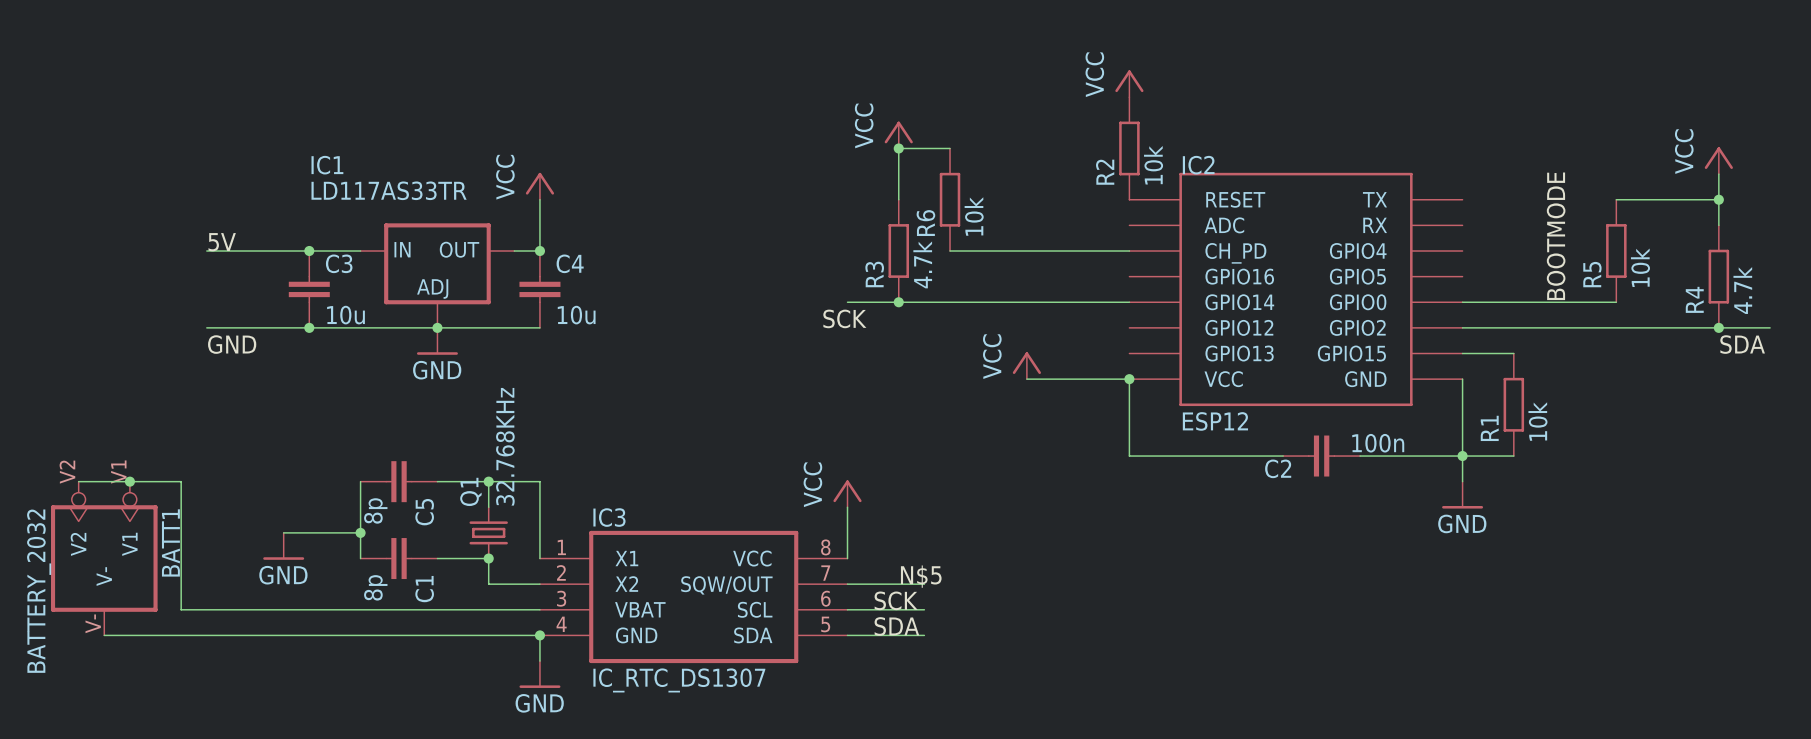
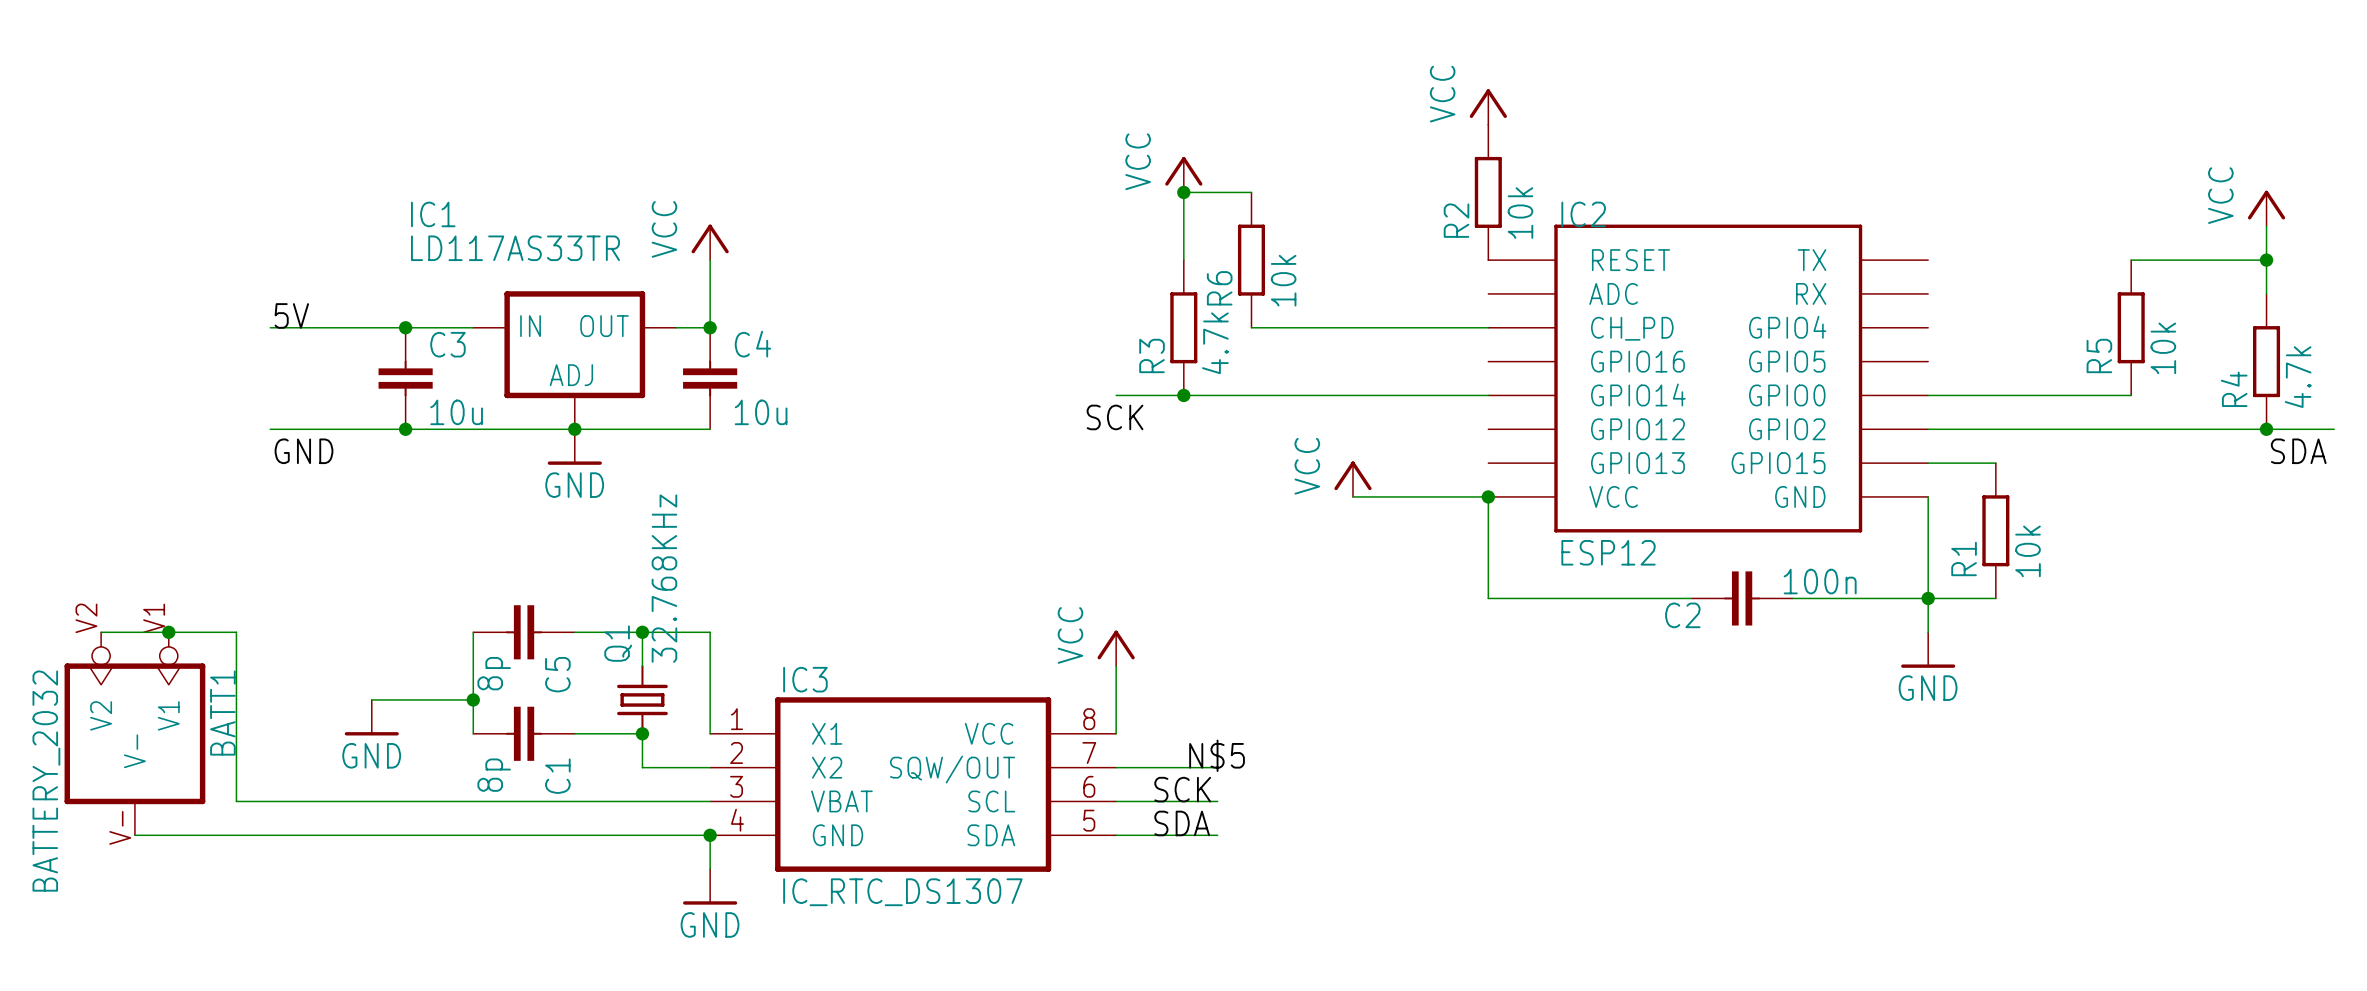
label: BOOTMODE (1556, 236) -> none

